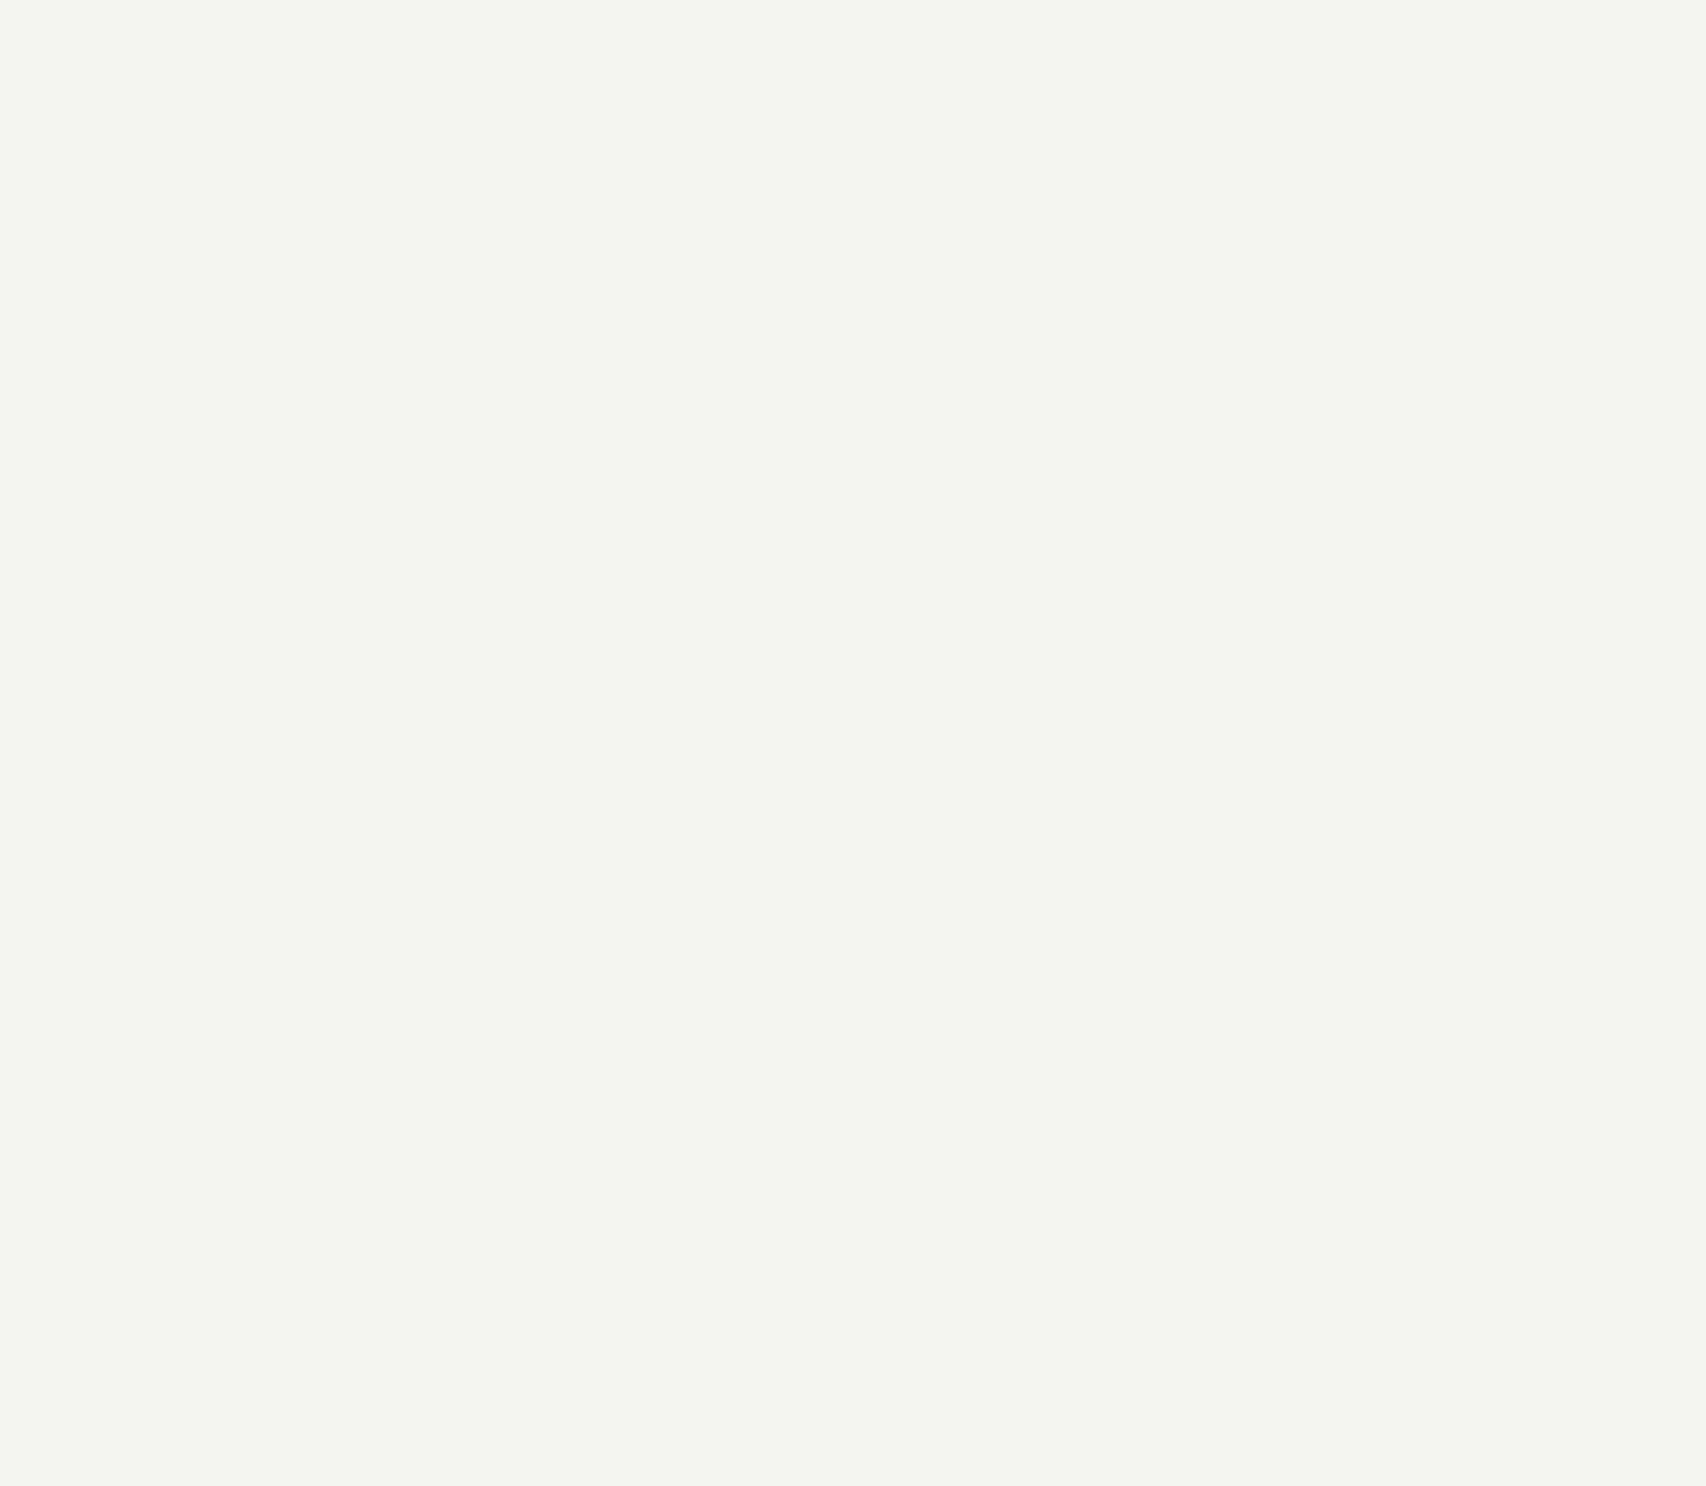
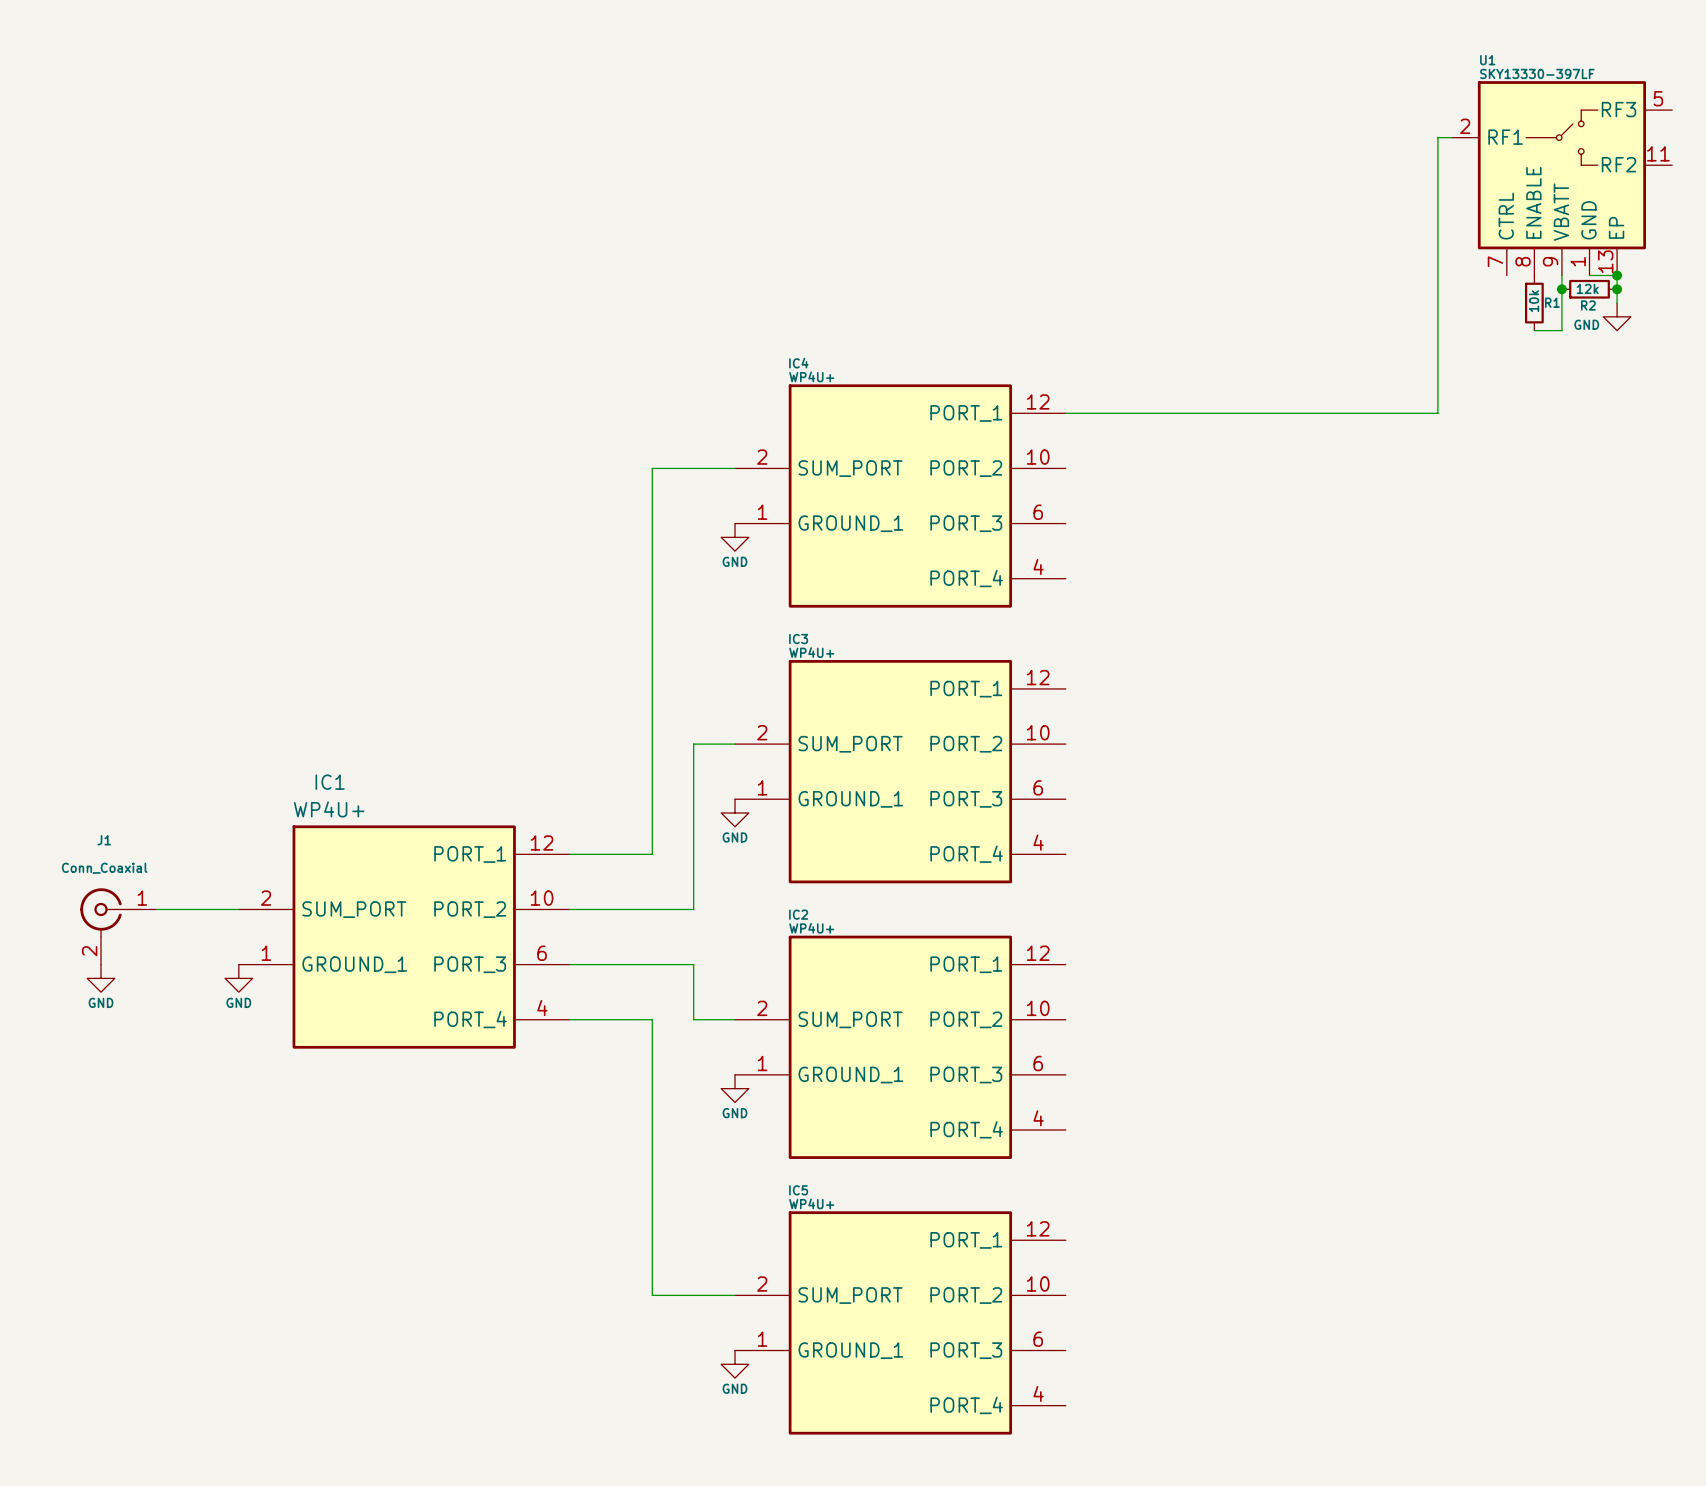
wire: none -> (1451, 137) (1437, 137) (1437, 413) (1065, 413)
U1: none -> SKY13330-397LF (1561, 178)
wire: none -> (1561, 275) (1561, 330) (1534, 330)
wire: none -> (1589, 275) (1617, 275) (1617, 303)
junction: none -> (1617, 275)
junction: none -> (1561, 289)
R2: none -> 12k (1589, 289)
junction: none -> (1617, 289)
R1: none -> 10k (1534, 303)
power symbol: none -> GND (1617, 316)
wire: none -> (735, 468) (652, 468) (652, 854) (569, 854)
IC4: none -> WP4U+ (900, 496)
power symbol: none -> GND (735, 537)
wire: none -> (735, 744) (693, 744) (693, 909) (569, 909)
IC3: none -> WP4U+ (900, 771)
power symbol: none -> GND (735, 813)
wire: none -> (156, 909) (238, 909)
J1: none -> Conn_Coaxial (118, 926)
IC1: none -> WP4U+ (404, 937)
wire: none -> (569, 964) (693, 964) (693, 1019) (735, 1019)
power symbol: none -> GND (101, 978)
power symbol: none -> GND (238, 978)
wire: none -> (569, 1019) (652, 1019) (652, 1295) (735, 1295)
IC2: none -> WP4U+ (900, 1047)
power symbol: none -> GND (735, 1088)
IC5: none -> WP4U+ (900, 1322)
power symbol: none -> GND (735, 1364)

